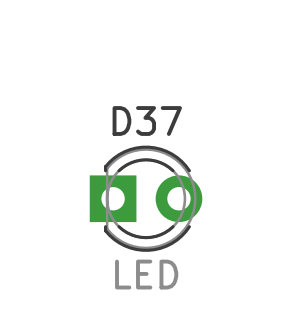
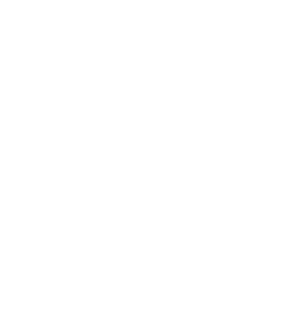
D37: LED (146, 198) -> none

